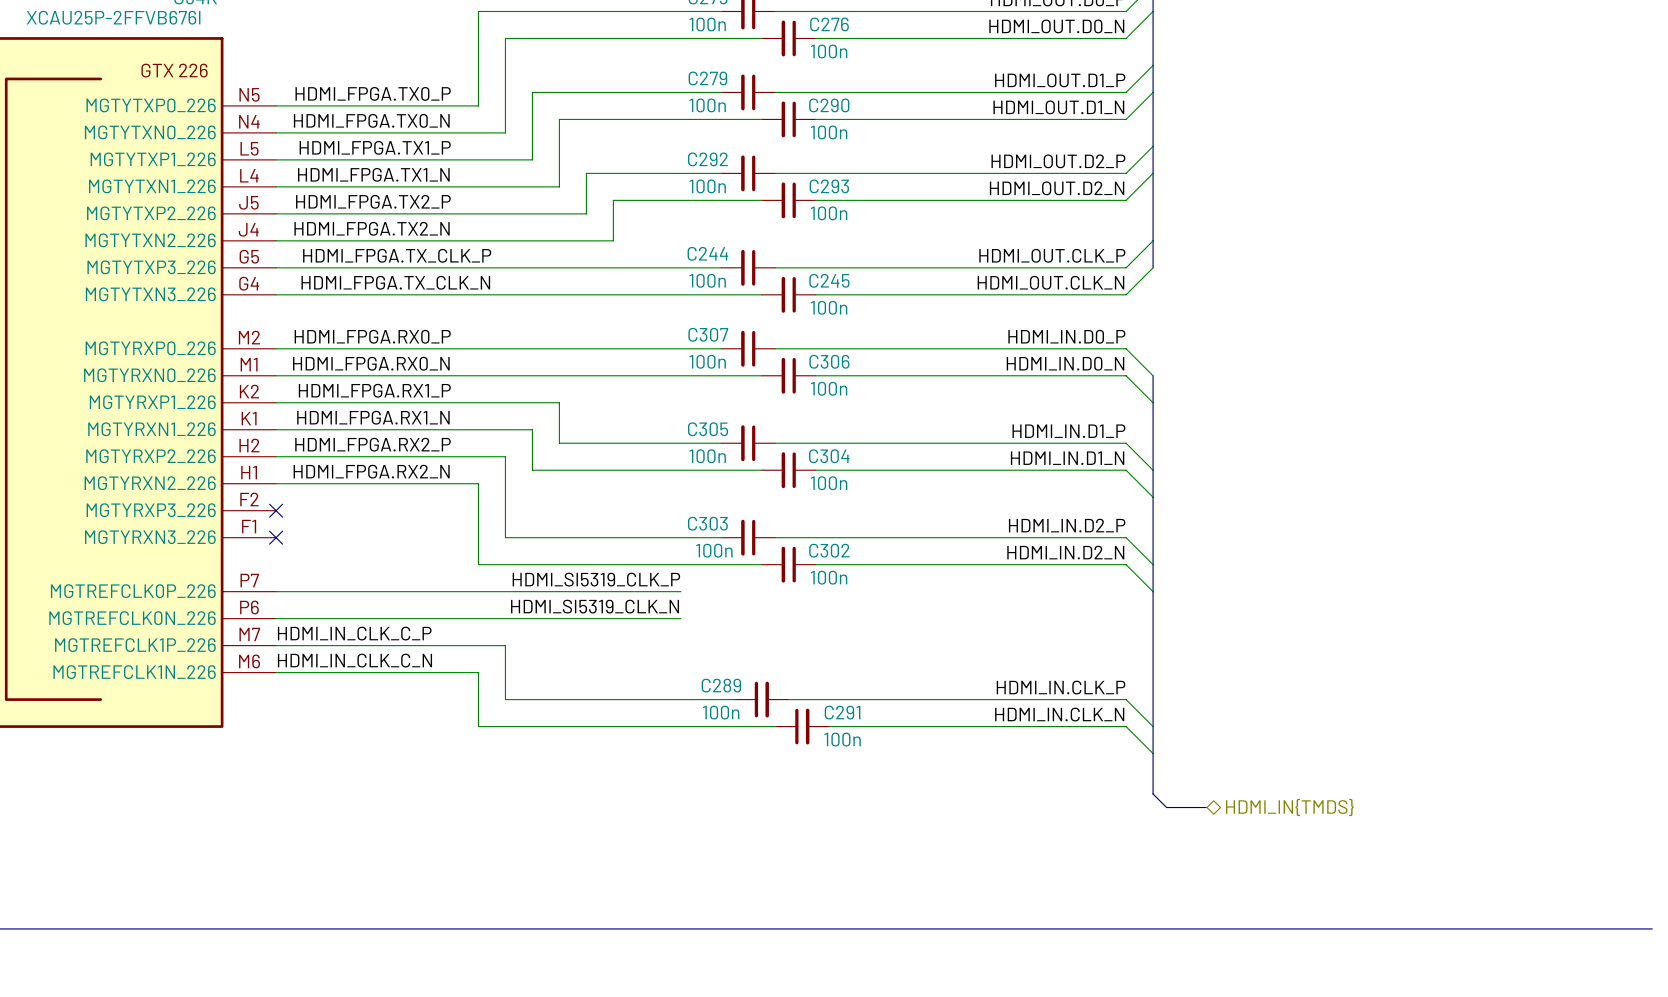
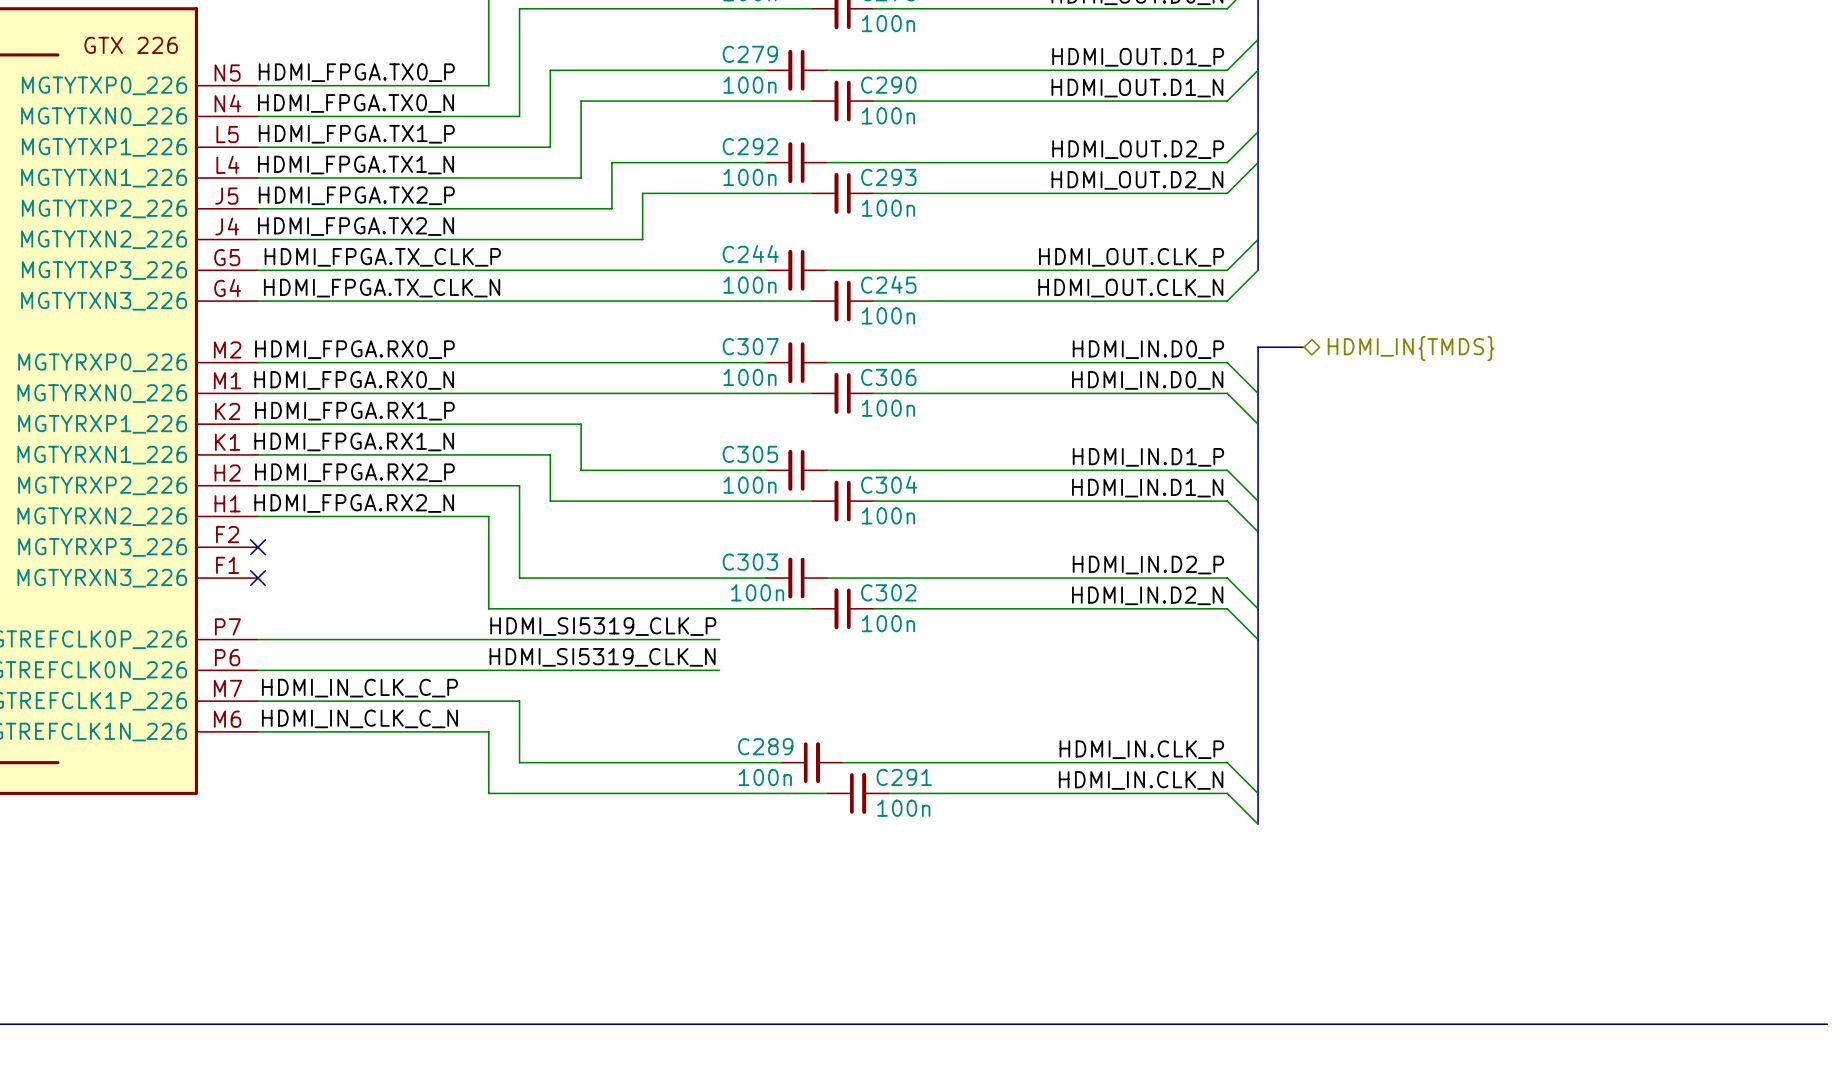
bus: none -> (1304, 347) (1258, 347) (1258, 393)
hierarchical label: none -> HDMI_IN{TMDS} (1411, 348)
bus: (1153, 753) (1153, 794) (1166, 807) (1207, 807) -> none
hierarchical label: HDMI_IN{TMDS} (1289, 807) -> none

